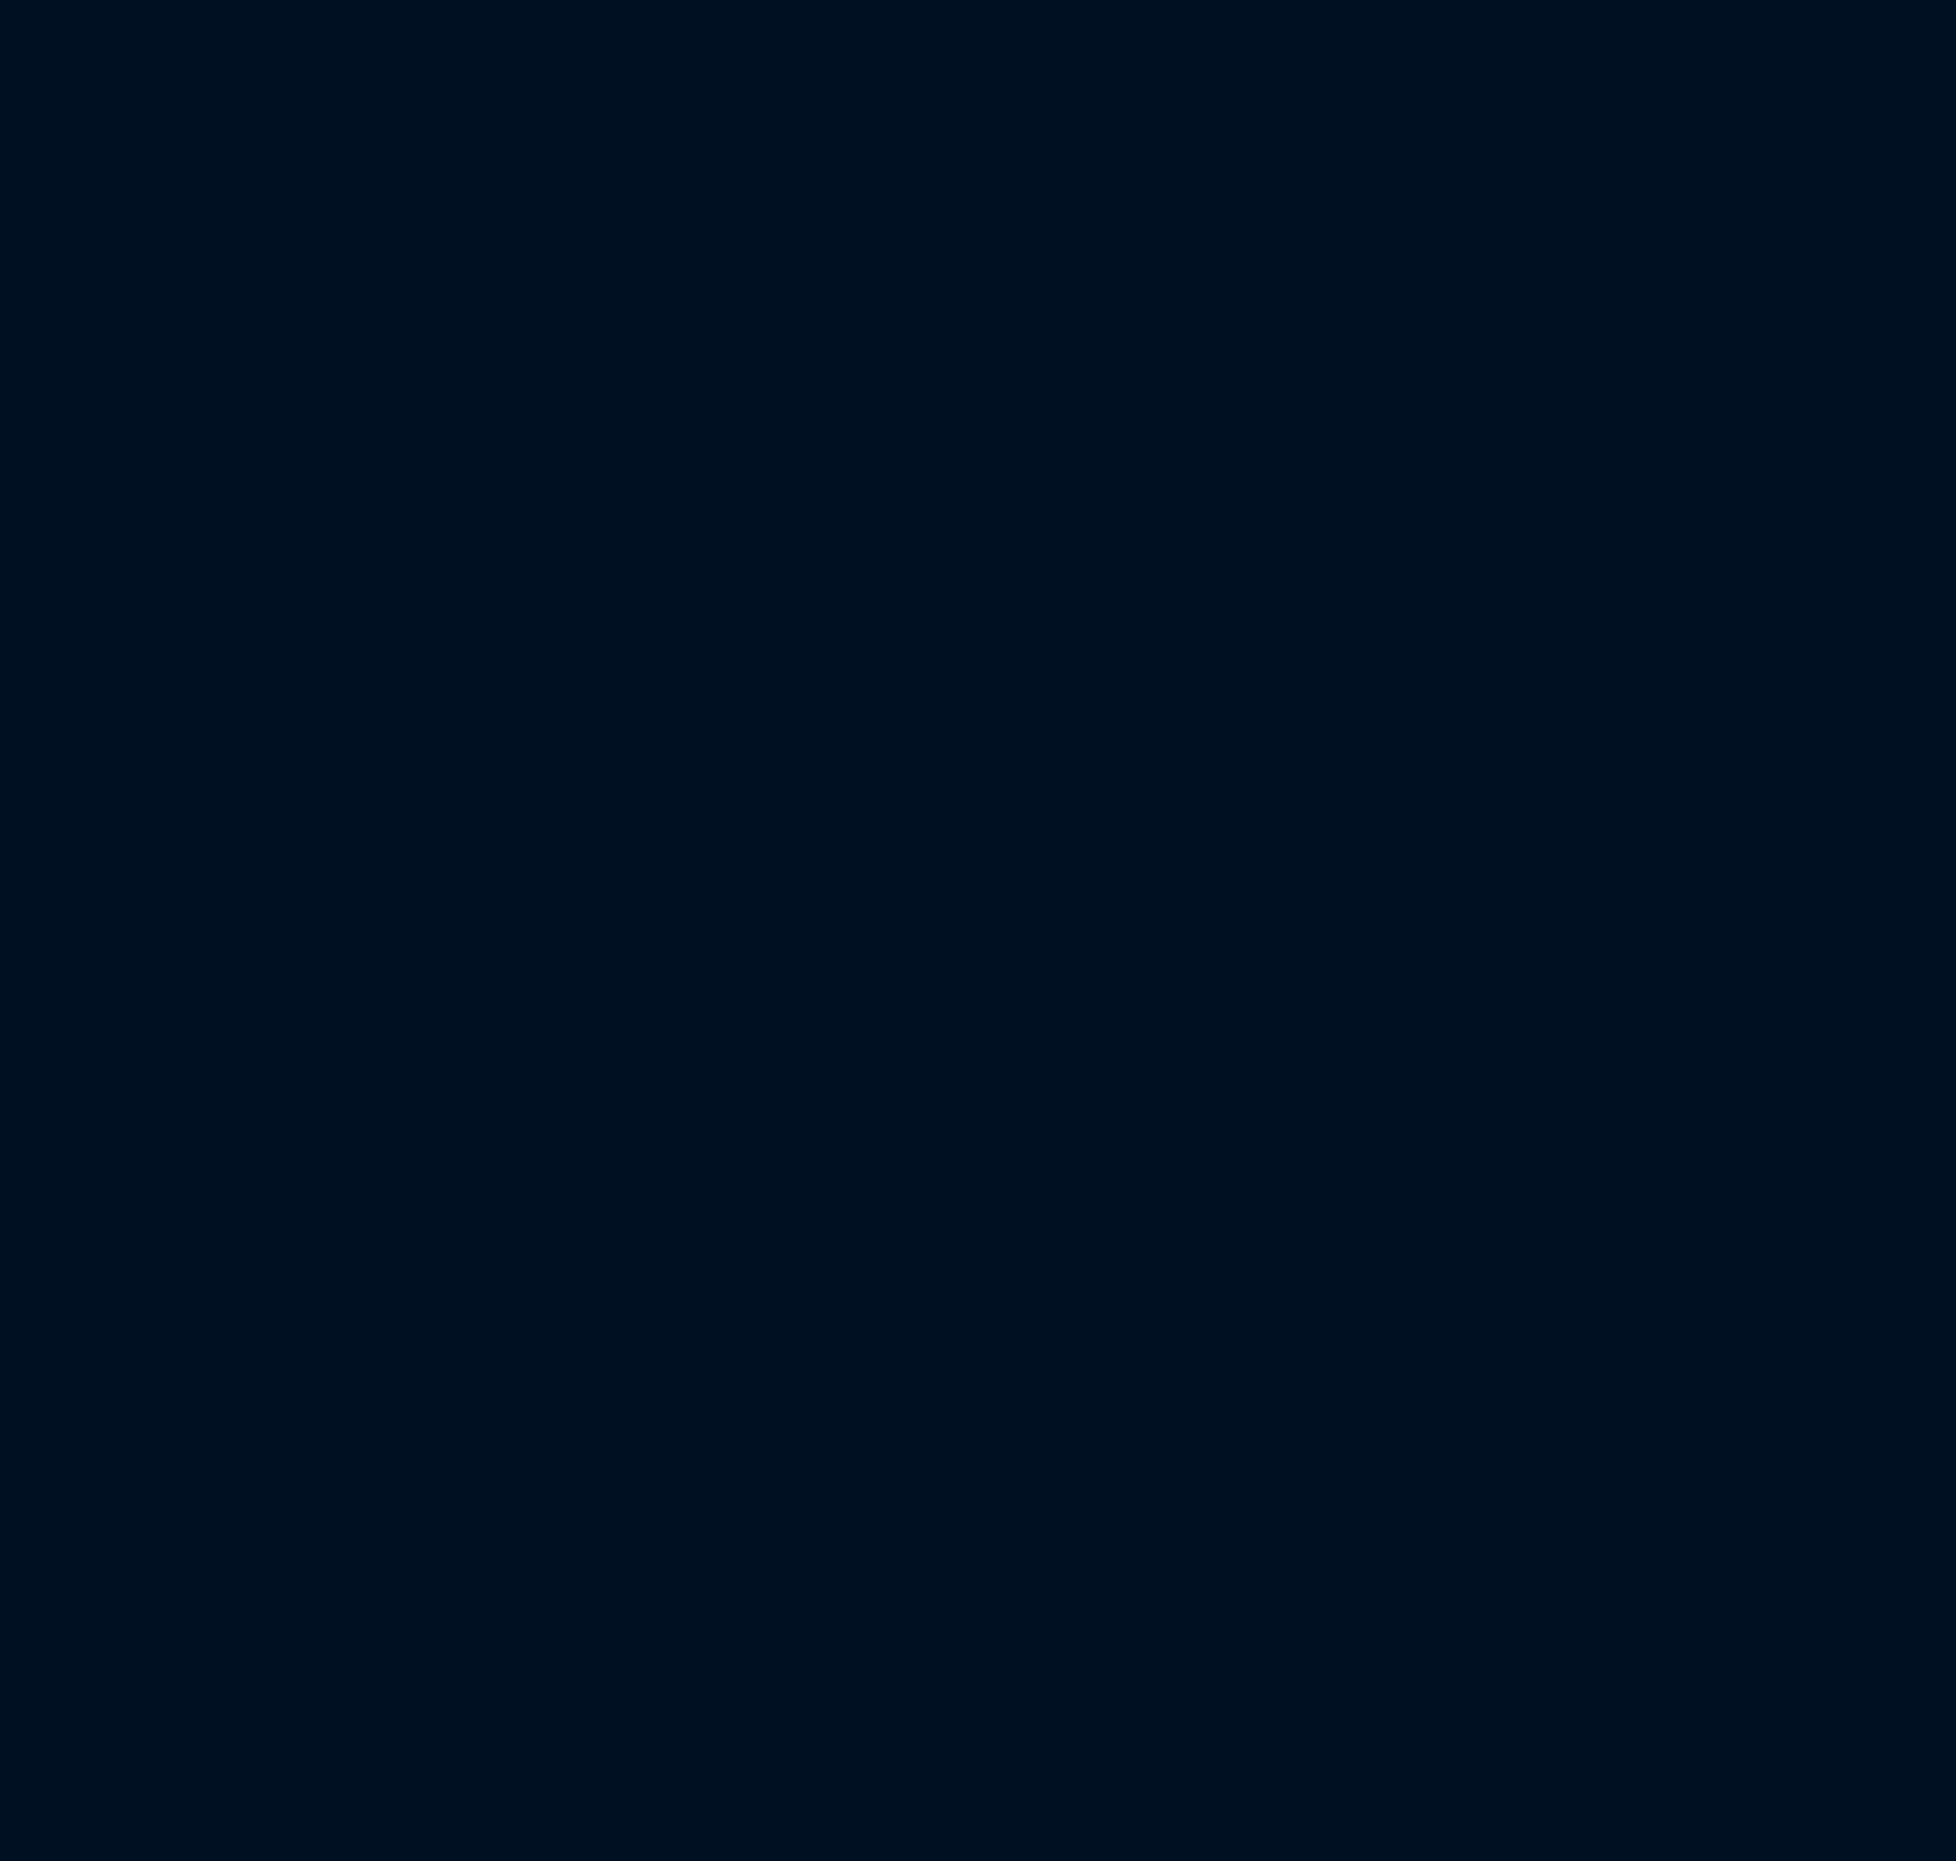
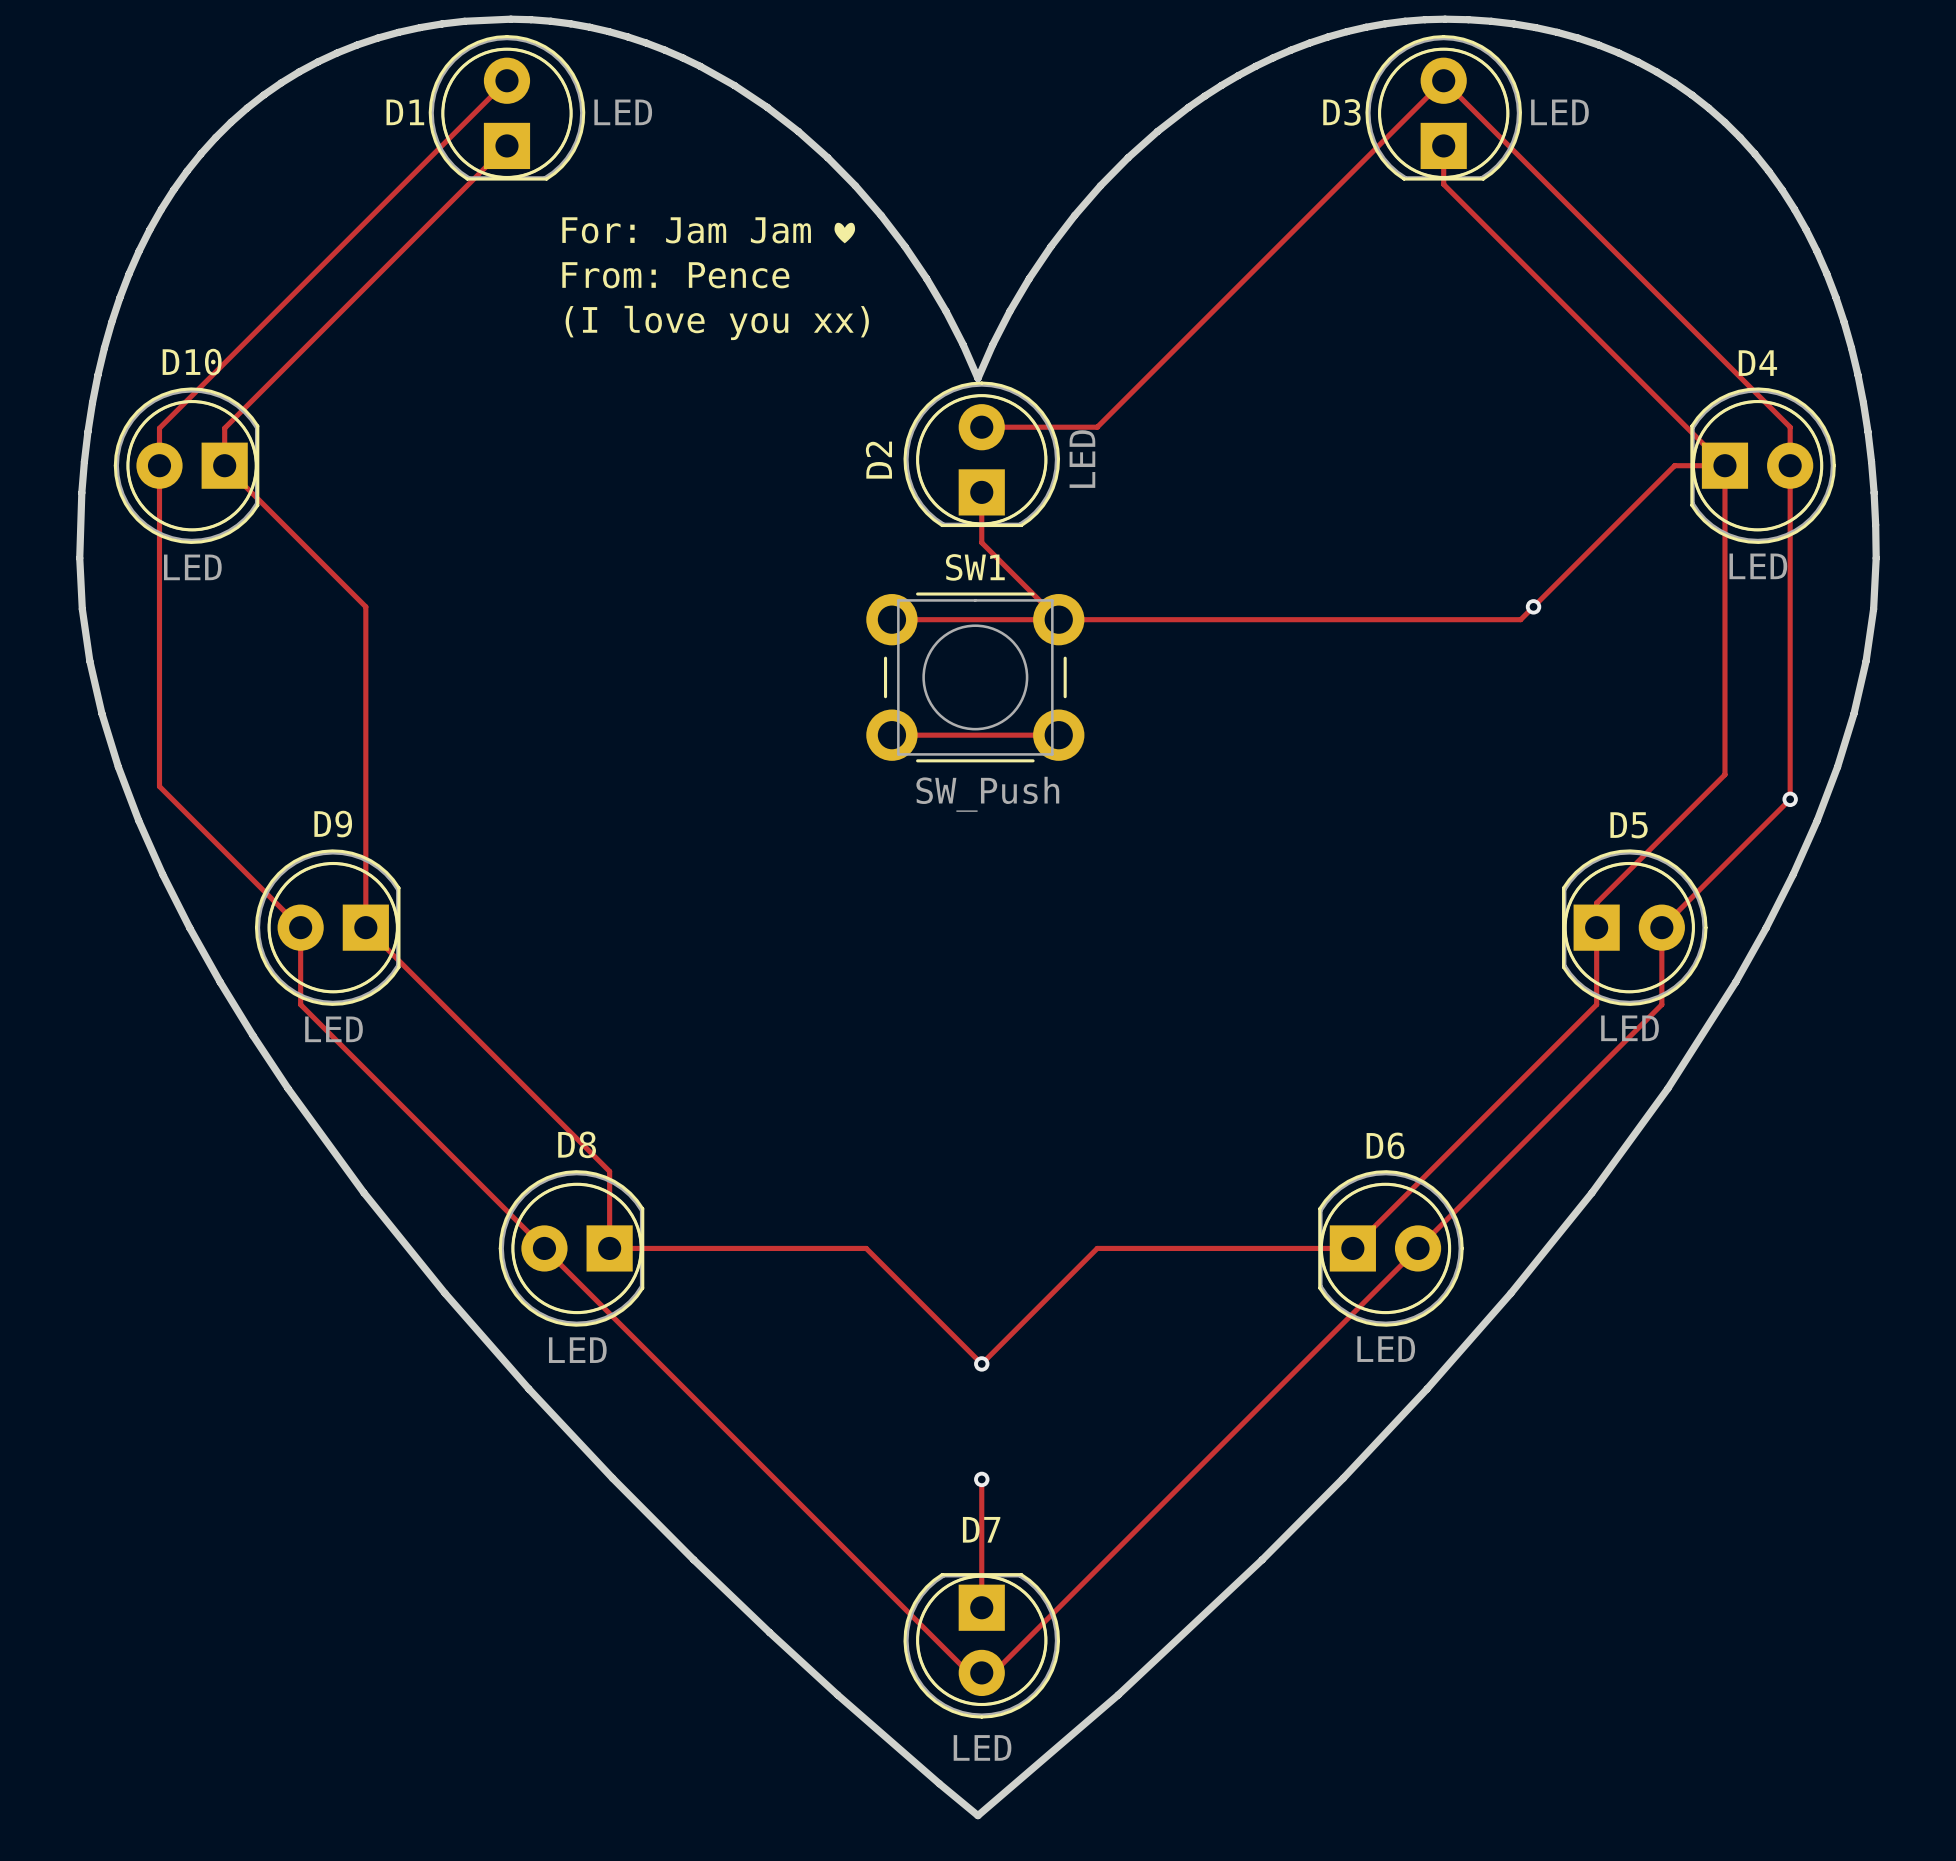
board edge: none -> (510, 19) (442, 23) (398, 32) (337, 52) (299, 71) (247, 108) (215, 137) (187, 171) (161, 209) (129, 273) (111, 322) (92, 402) (84, 461) (79, 558) (82, 609) (89, 661) (101, 713) (118, 766) (138, 820) (189, 928) (252, 1035) (288, 1088) (363, 1192) (445, 1293) (528, 1388) (612, 1478) (769, 1632) (837, 1694) (977, 1815) (1118, 1694) (1262, 1559) (1343, 1478) (1427, 1388) (1510, 1293) (1591, 1192) (1667, 1088) (1735, 981) (1793, 874) (1817, 820) (1837, 766) (1853, 713) (1866, 661) (1873, 609) (1875, 524) (1867, 431) (1851, 348) (1826, 273) (1794, 209) (1754, 153) (1724, 122) (1691, 94) (1637, 61) (1578, 38) (1513, 23) (1468, 19) (1424, 19) (1366, 27) (1328, 36) (1291, 50) (1255, 66) (1221, 85) (1157, 131) (1100, 185) (1050, 246) (1009, 311) (977, 378) (946, 311) (926, 278) (881, 215) (827, 157) (767, 107) (734, 85) (700, 66) (646, 43) (609, 31) (570, 23) (510, 19)
track: none -> (506, 80) (159, 428) (159, 786) (300, 927) (300, 1004) (968, 1672) (993, 1672) (1661, 1004) (1661, 927) (1790, 799) (1790, 427) (1443, 80) (1097, 427) (981, 427)
D1: none -> LED (506, 107)
D3: none -> LED (1443, 107)
track: none -> (506, 145) (224, 428) (224, 465) (365, 606) (365, 927) (609, 1171) (609, 1248) (866, 1248) (981, 1363) (1097, 1248) (1352, 1248) (1596, 1004) (1596, 903) (1724, 774) (1724, 465)
track: none -> (1443, 145) (1443, 184) (1724, 465)
drawing: none -> [834, 222, 856, 244]
text: none -> For: Jam Jam (686, 230)
text: none -> From: Pence (675, 275)
text: none -> (I love you xx) (717, 322)
D2: none -> LED (981, 454)
D10: none -> LED (186, 465)
track: none -> (1724, 465) (1674, 465) (1520, 619) (891, 619)
D4: none -> LED (1763, 465)
track: none -> (981, 492) (981, 542) (1058, 619)
via: none -> (1533, 606)
SW1: none -> SW_Push (975, 677)
track: none -> (891, 735) (1058, 735)
via: none -> (1790, 799)
D9: none -> LED (327, 927)
D5: none -> LED (1634, 927)
D8: none -> LED (571, 1248)
D6: none -> LED (1390, 1248)
via: none -> (981, 1363)
track: none -> (981, 1479) (981, 1607)
via: none -> (981, 1479)
D7: none -> LED (981, 1645)

